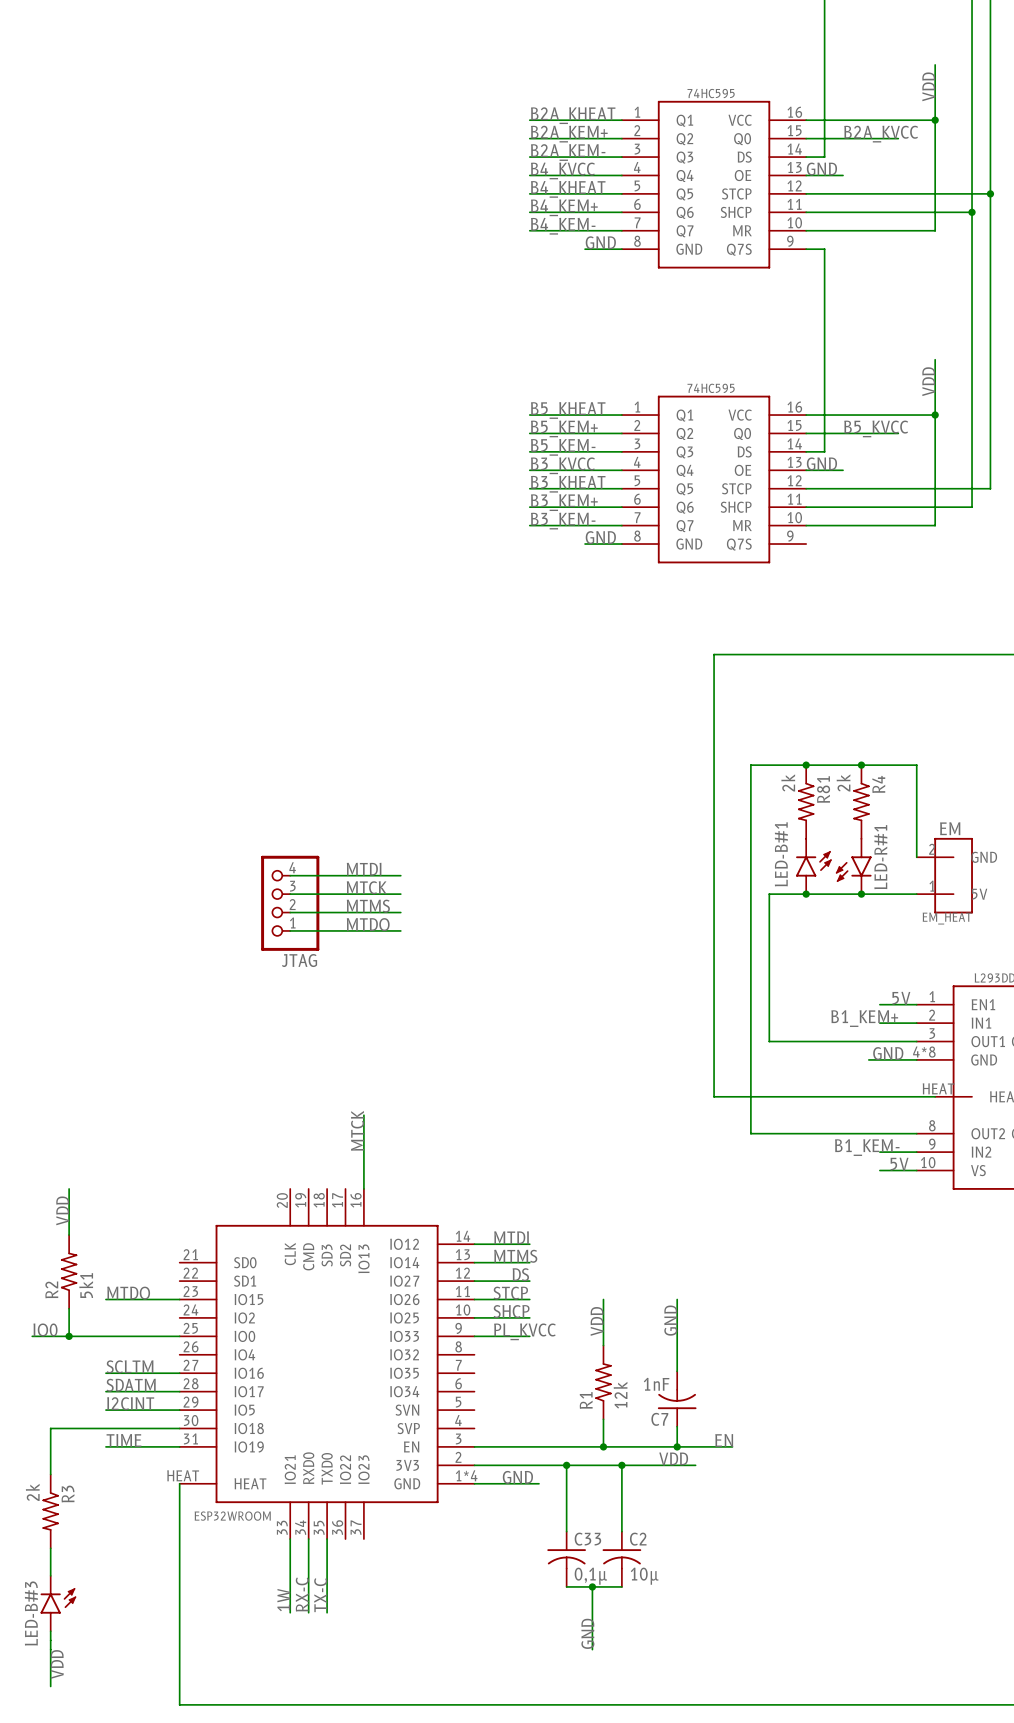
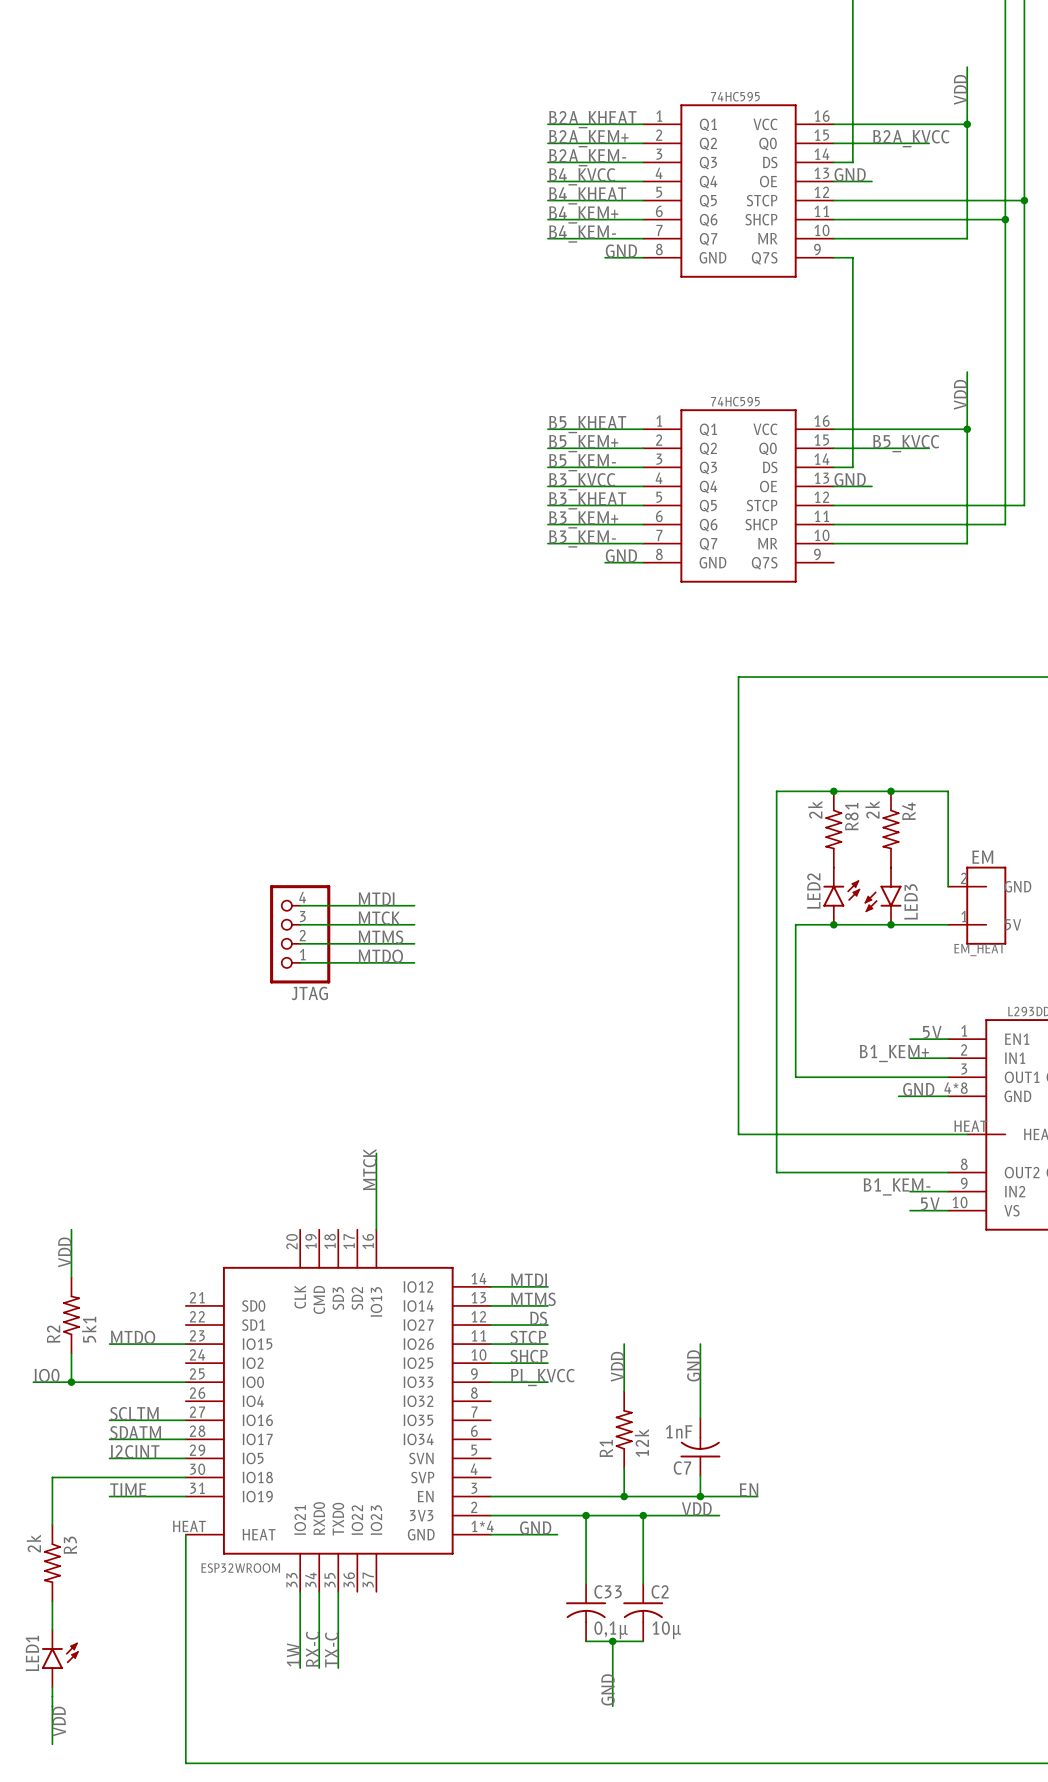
LED-B#1 name: LED-B#1 (781, 854) -> LED2 (813, 891)
LED-R#1 name: LED-R#1 (880, 857) -> LED3 (911, 901)
LED-B#3 name: LED-B#3 (31, 1613) -> LED1 (32, 1653)

